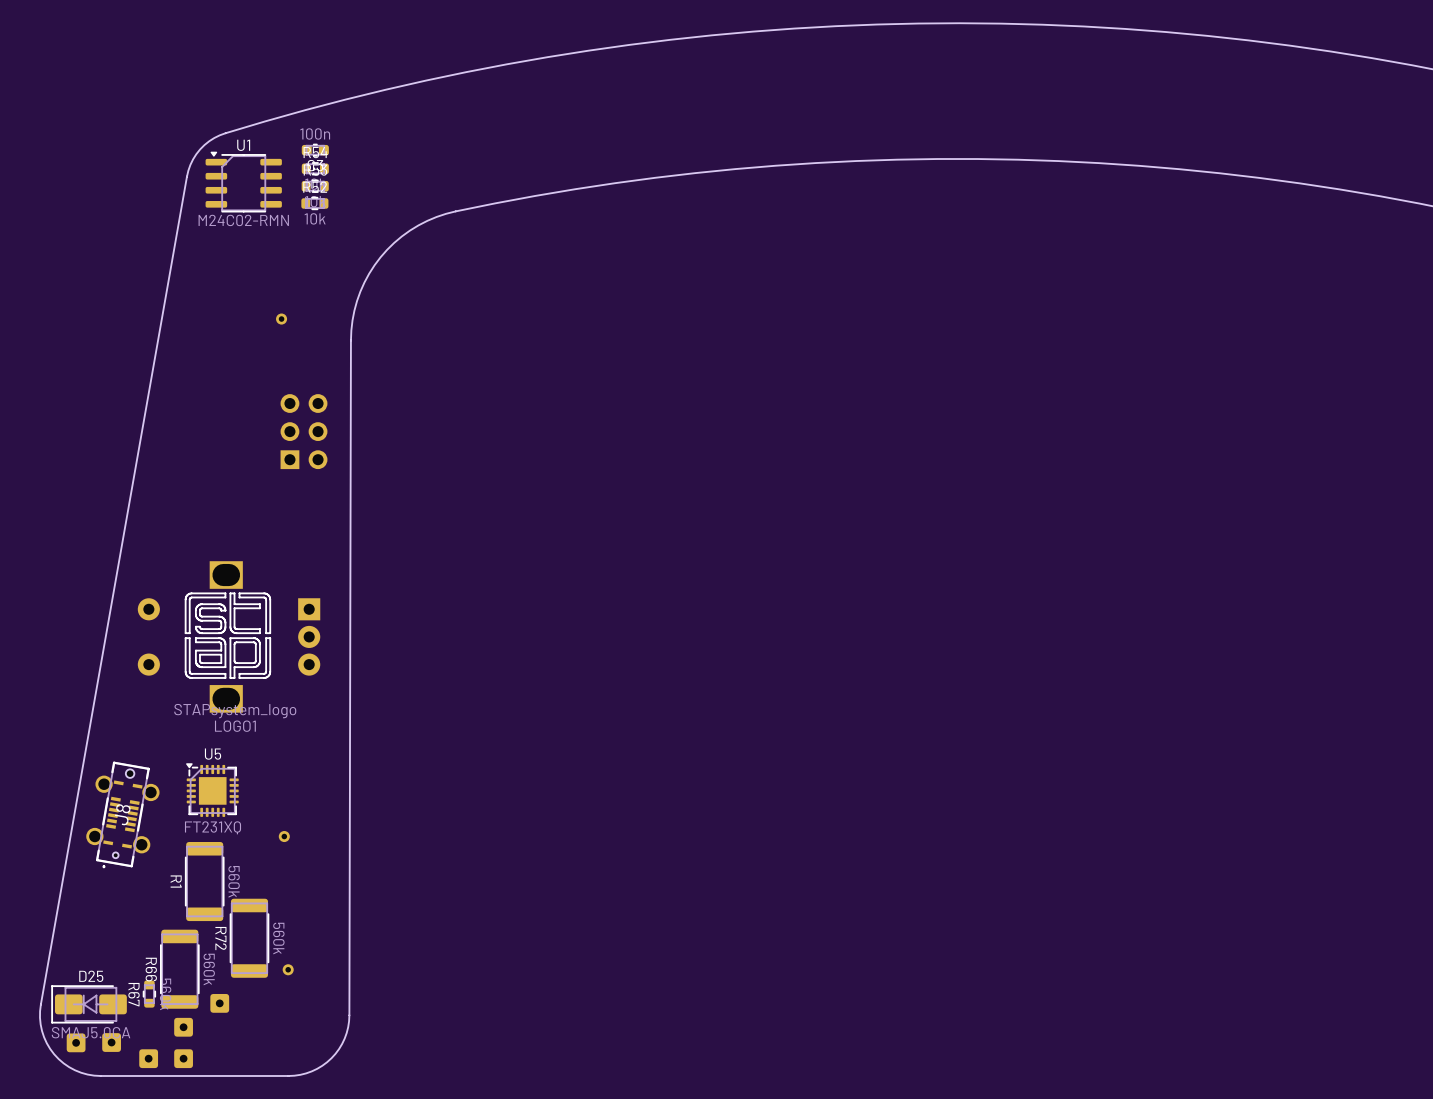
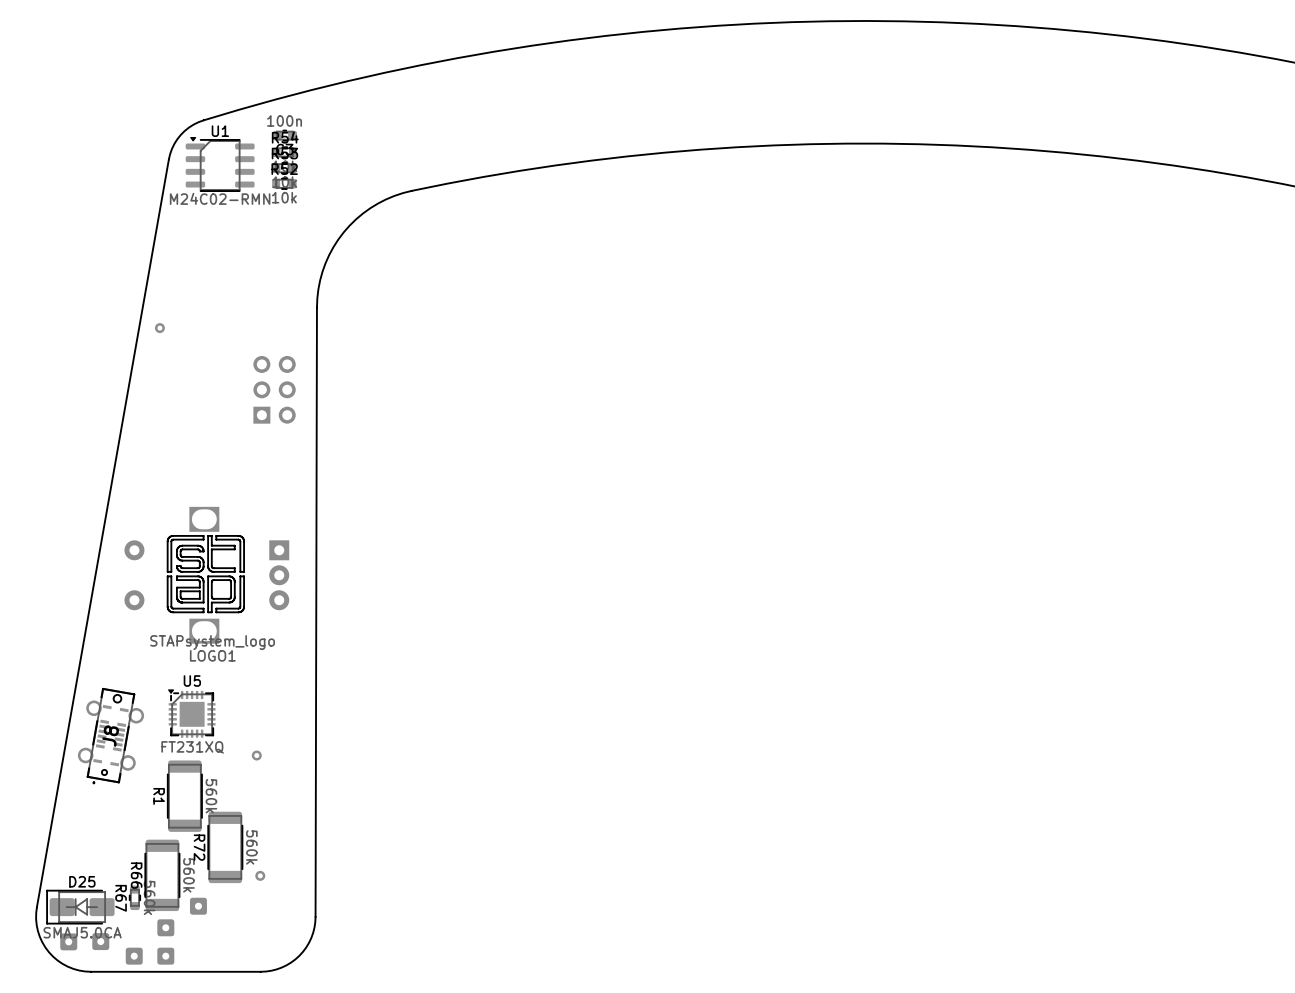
part position: (281, 319) -> (159, 328)

